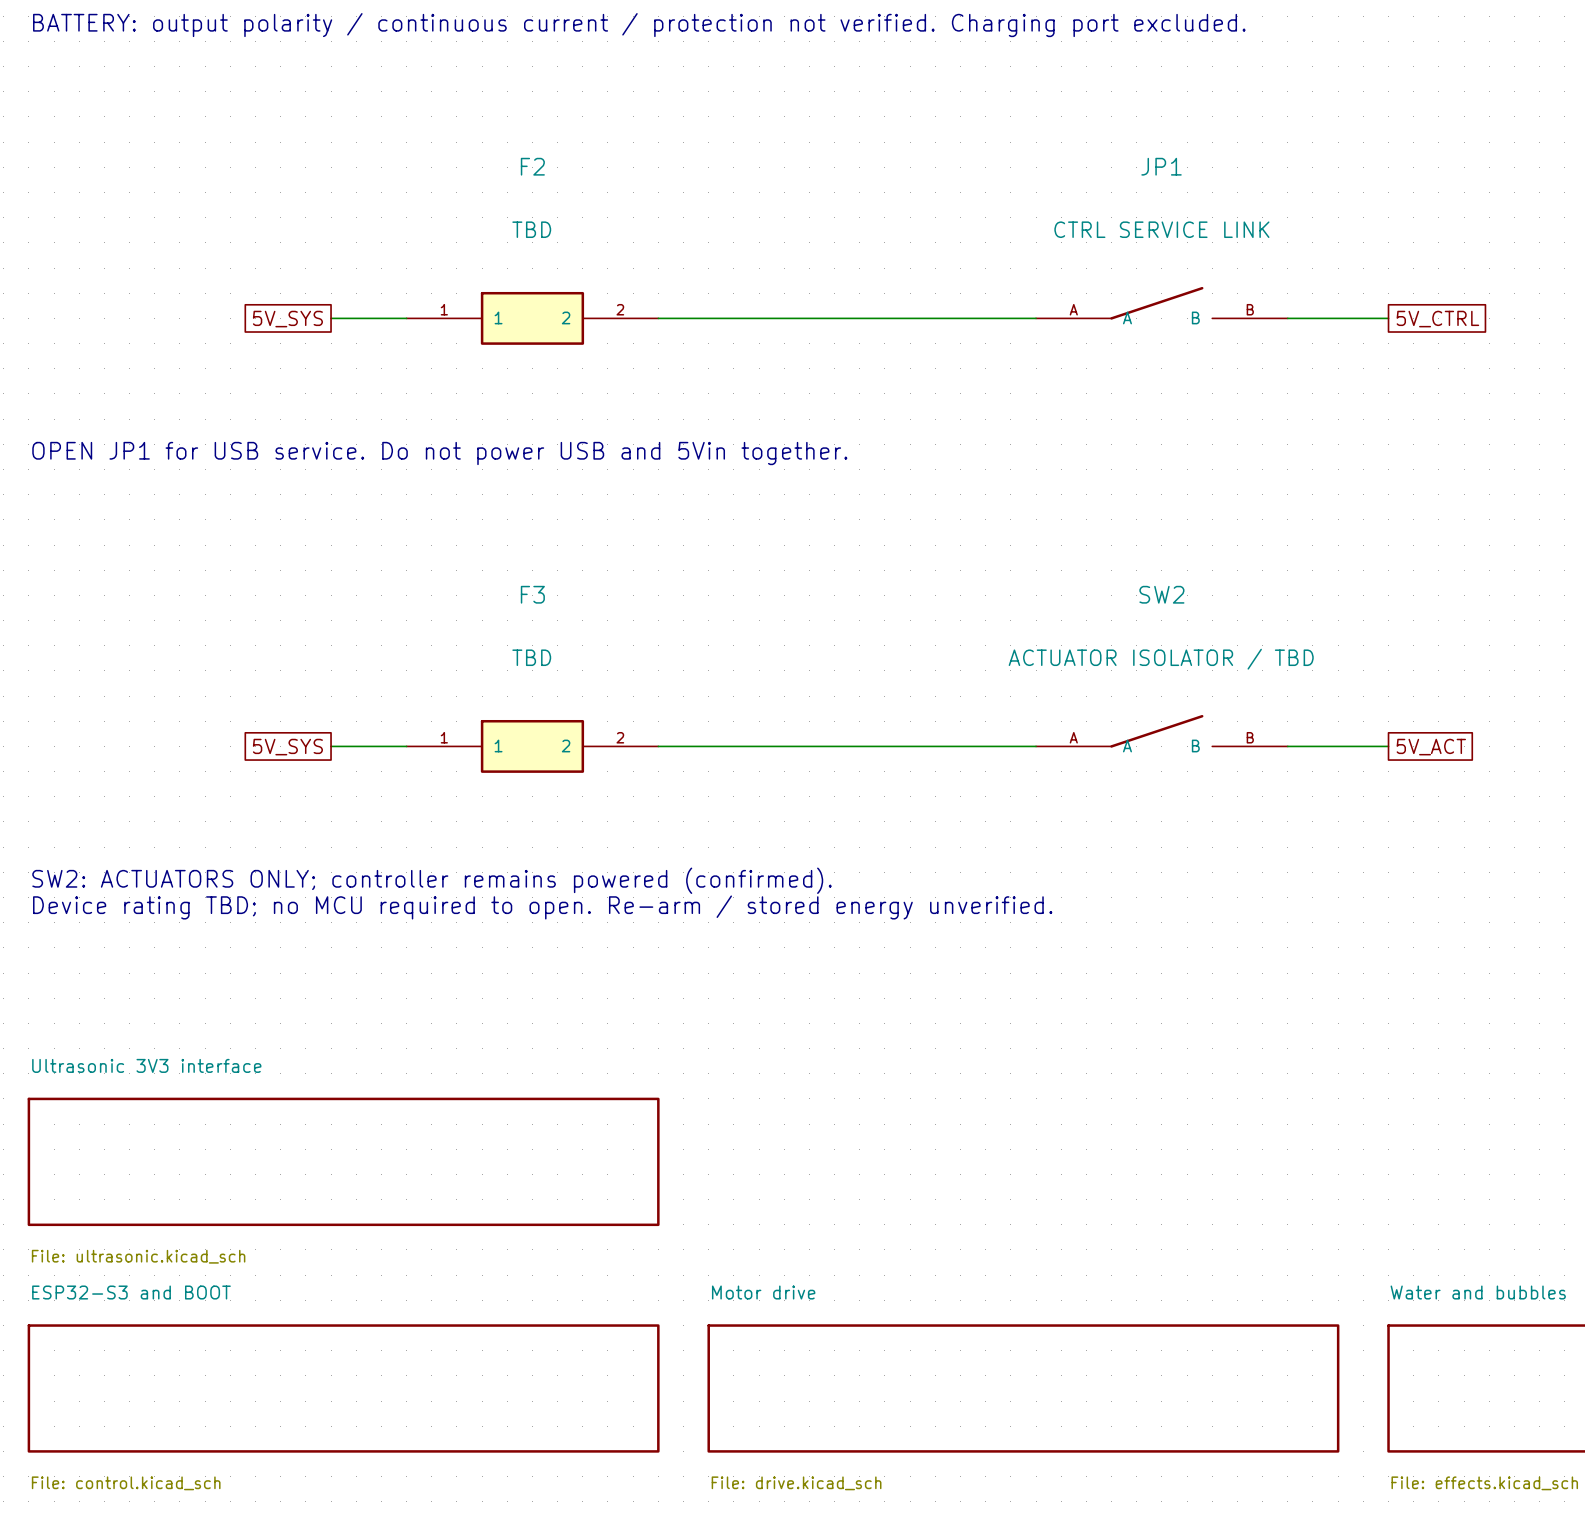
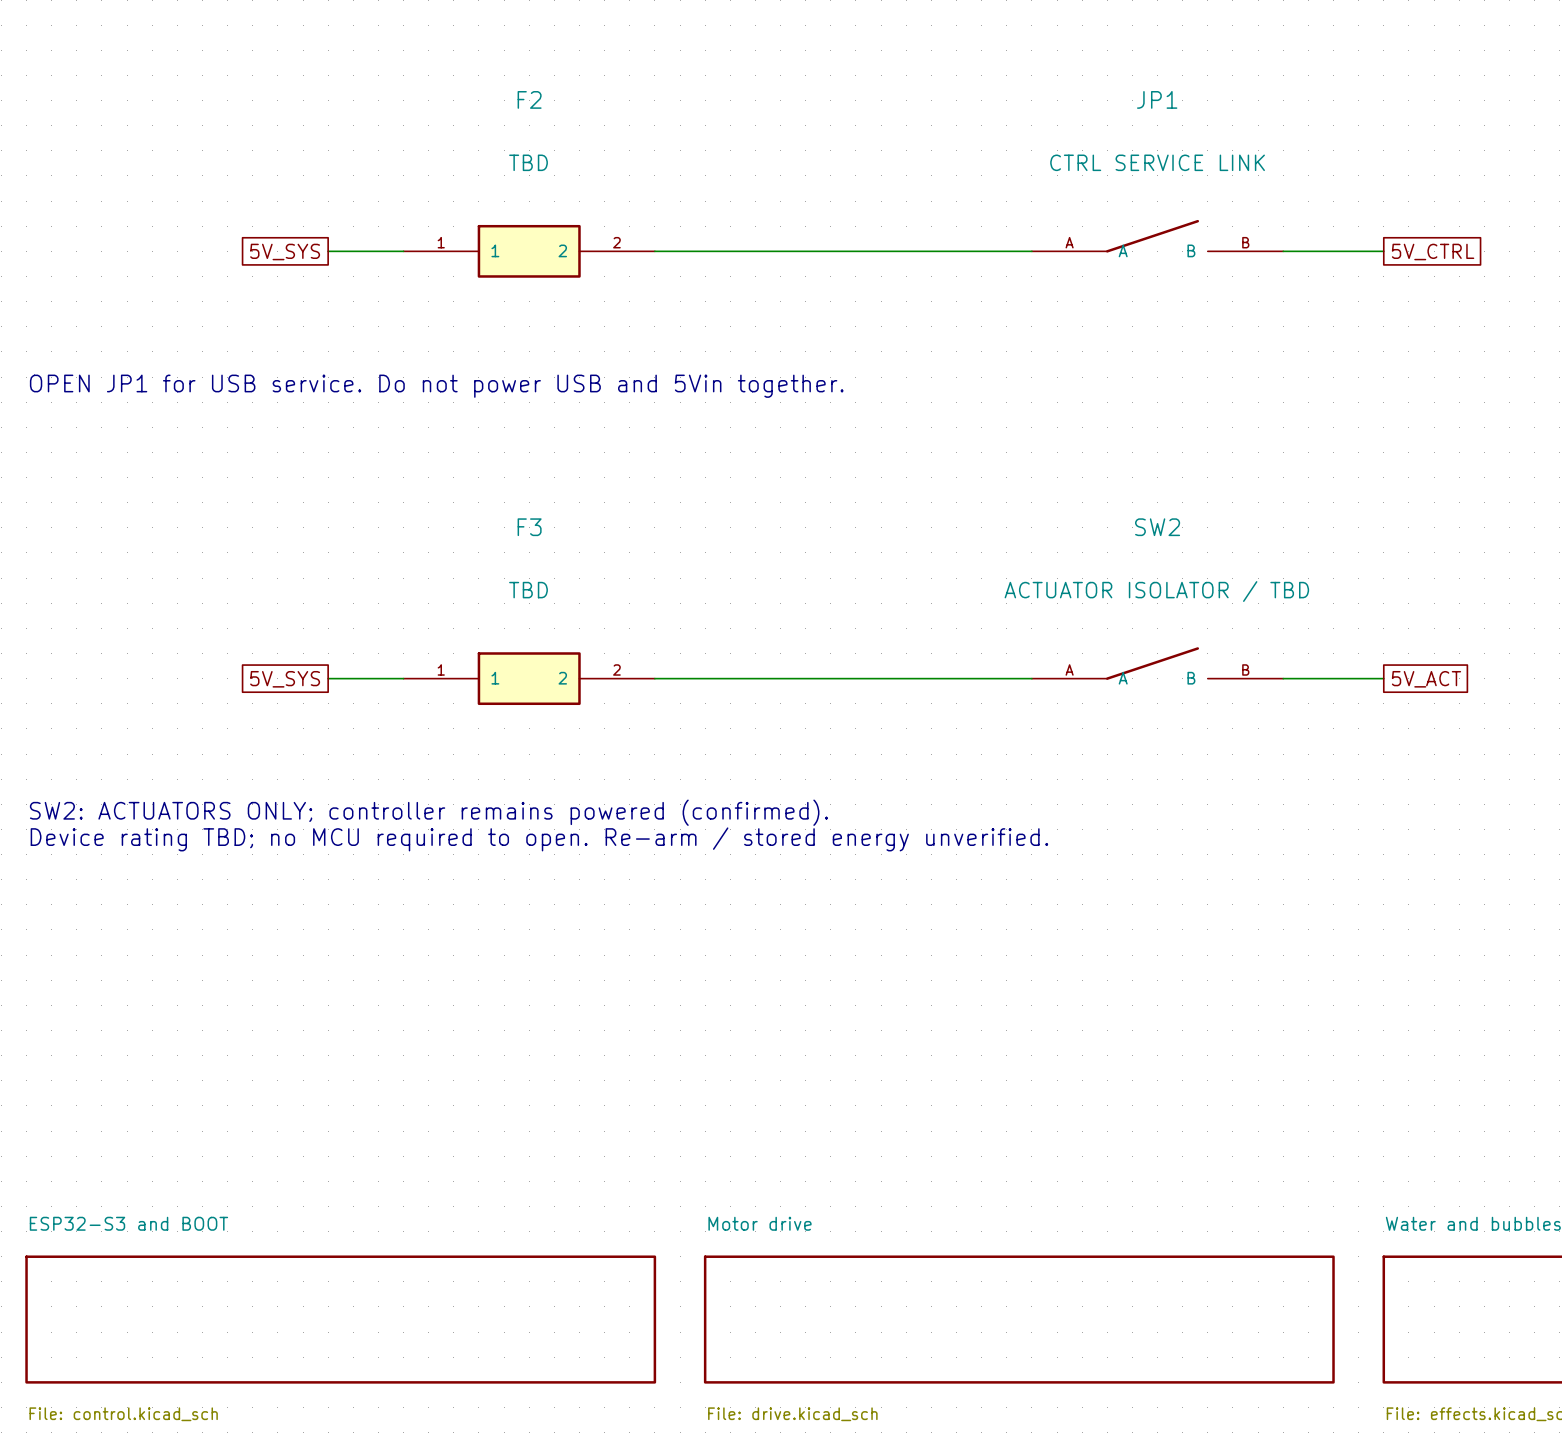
sheet Ultrasonic 3V3 interface: File: ultrasonic.kicad_sch (343, 1161) -> none

